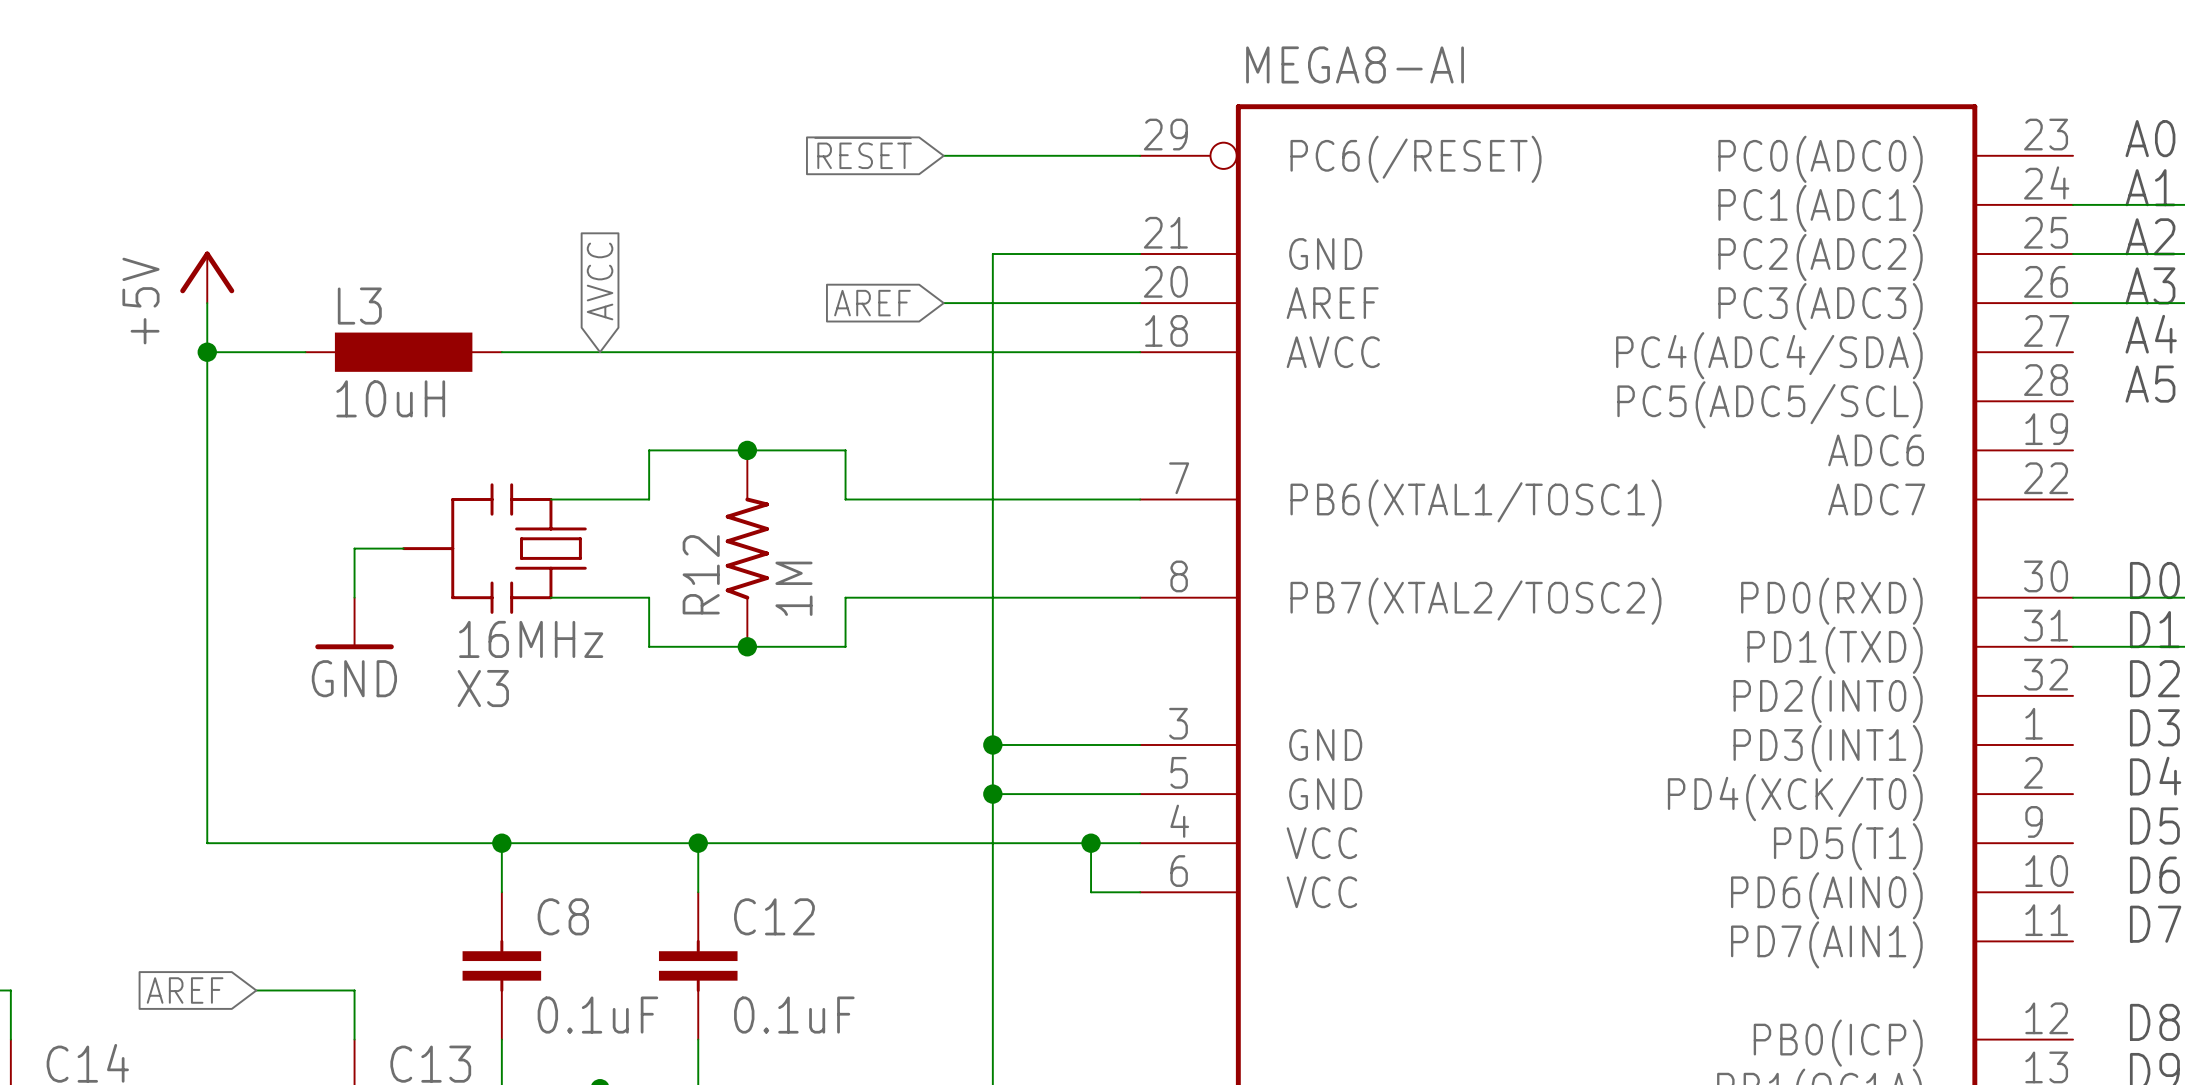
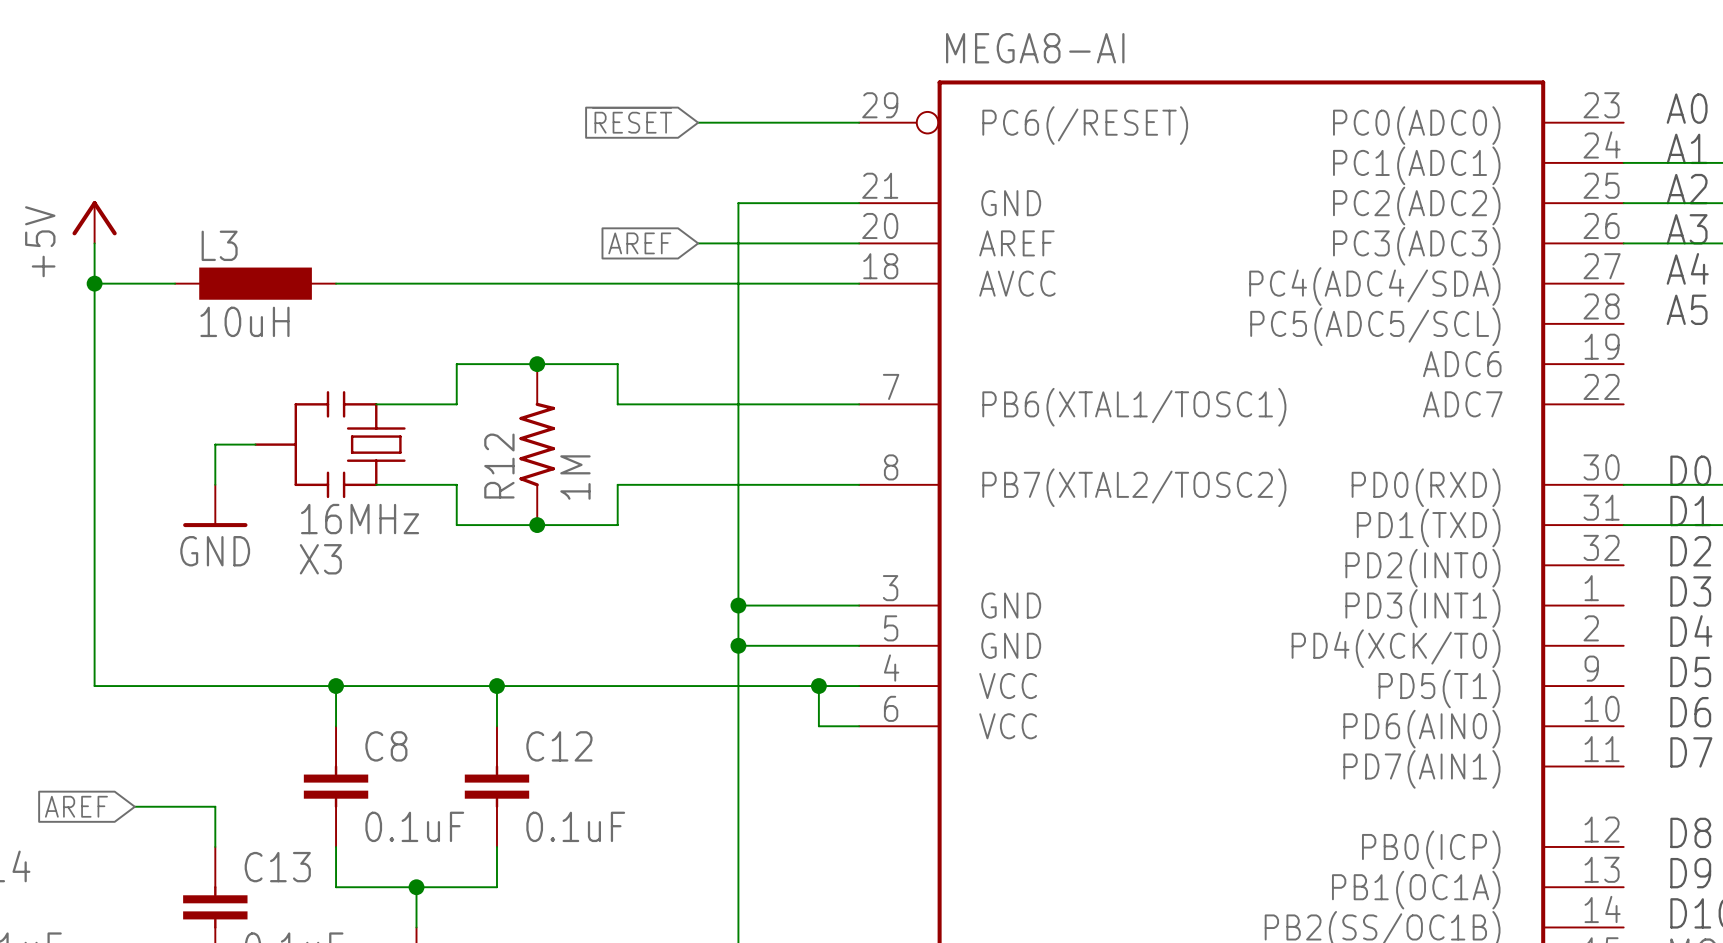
global label: AVCC (600, 281) -> none

